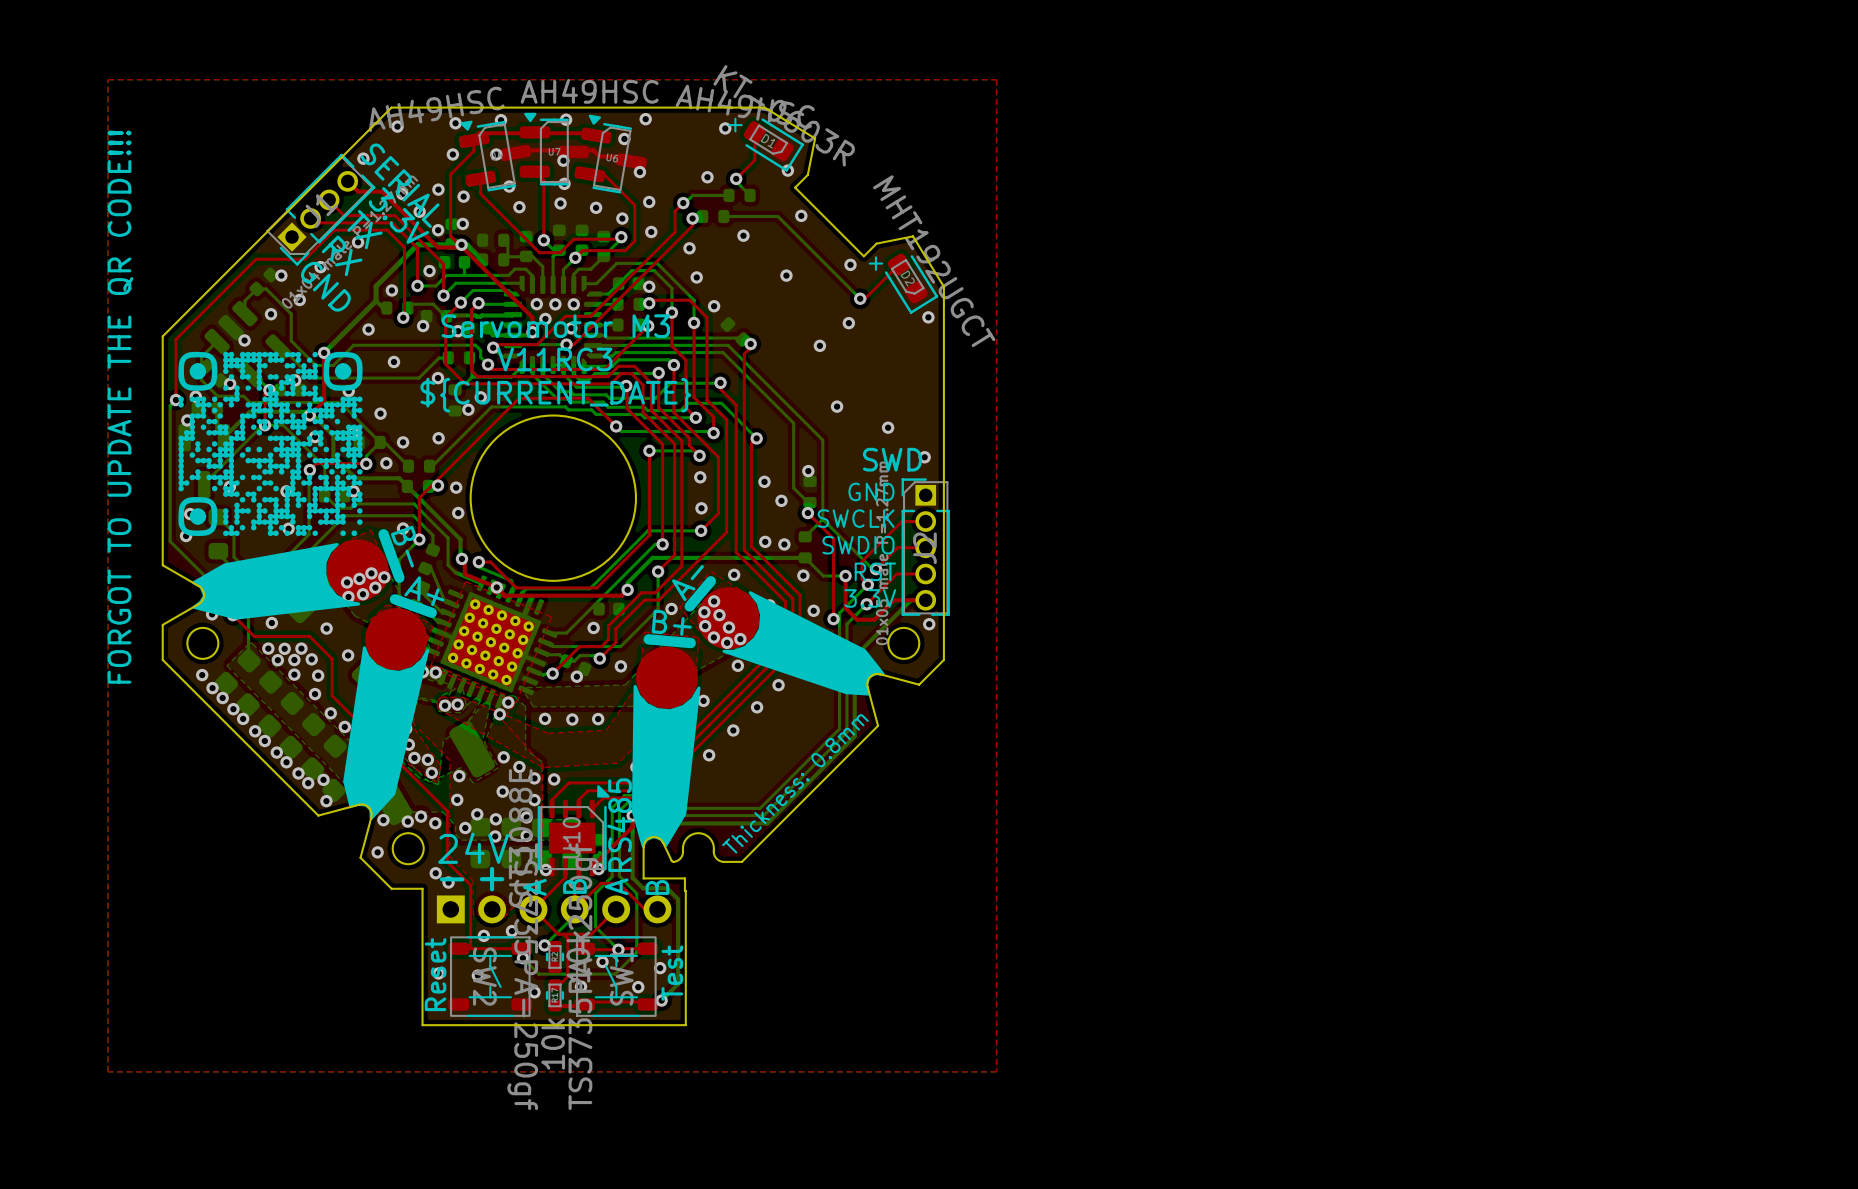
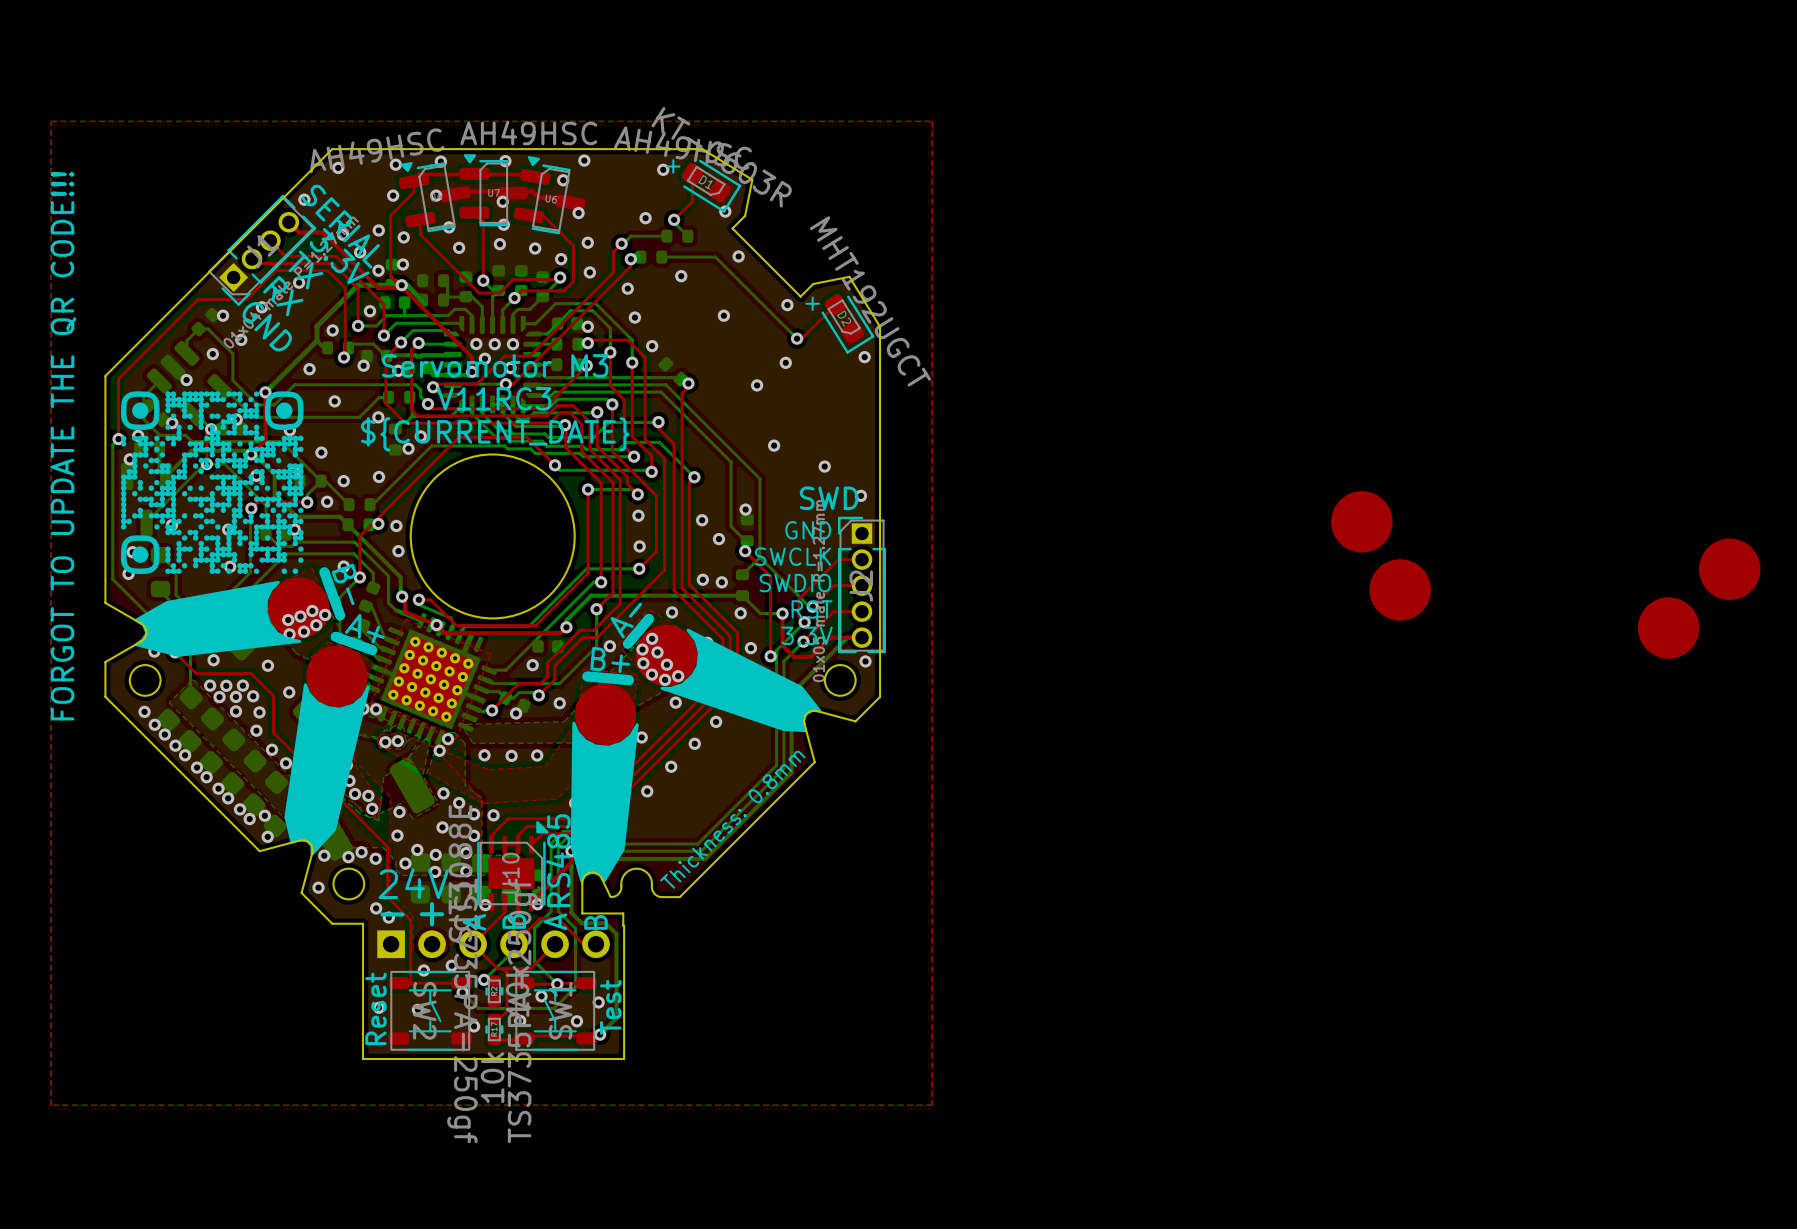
part: none -> (1361, 521)
part: none -> (1729, 569)
part: none -> (1400, 589)
part: none -> (1668, 628)

